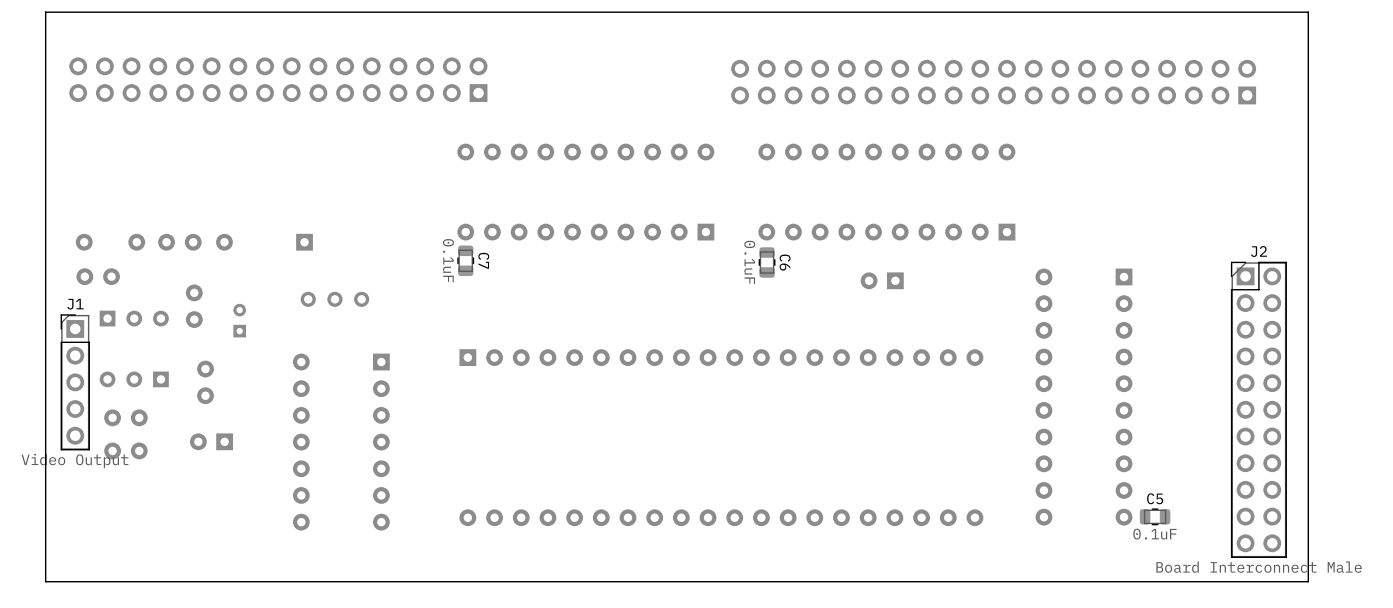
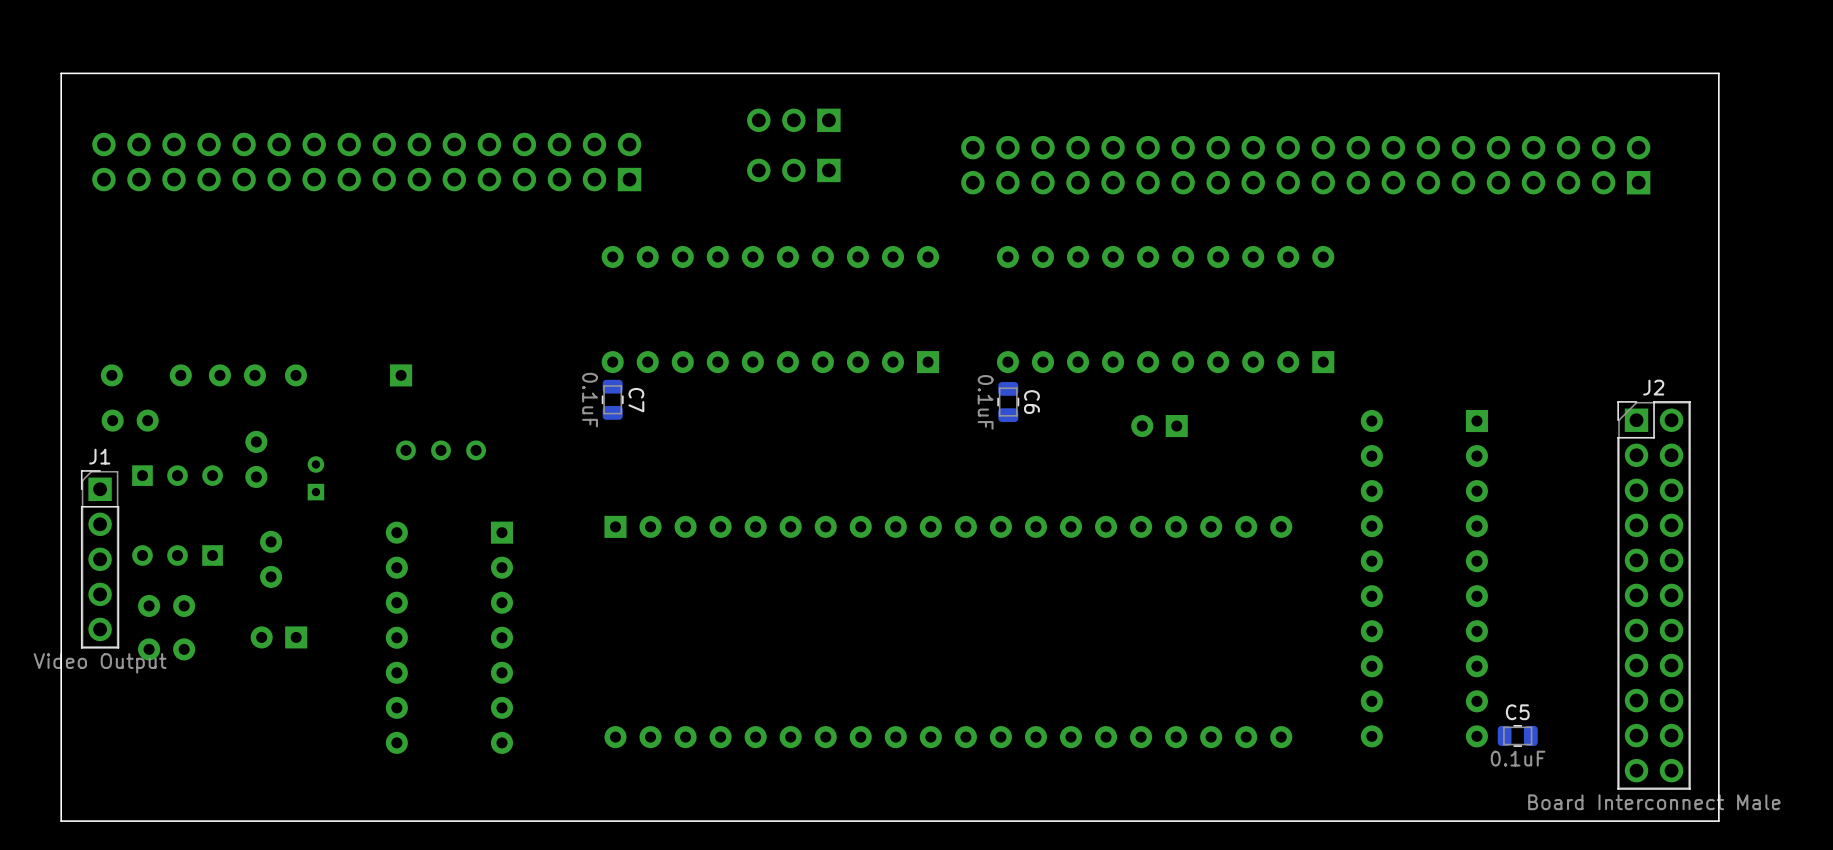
part: none -> (793, 120)
part: none -> (793, 170)

